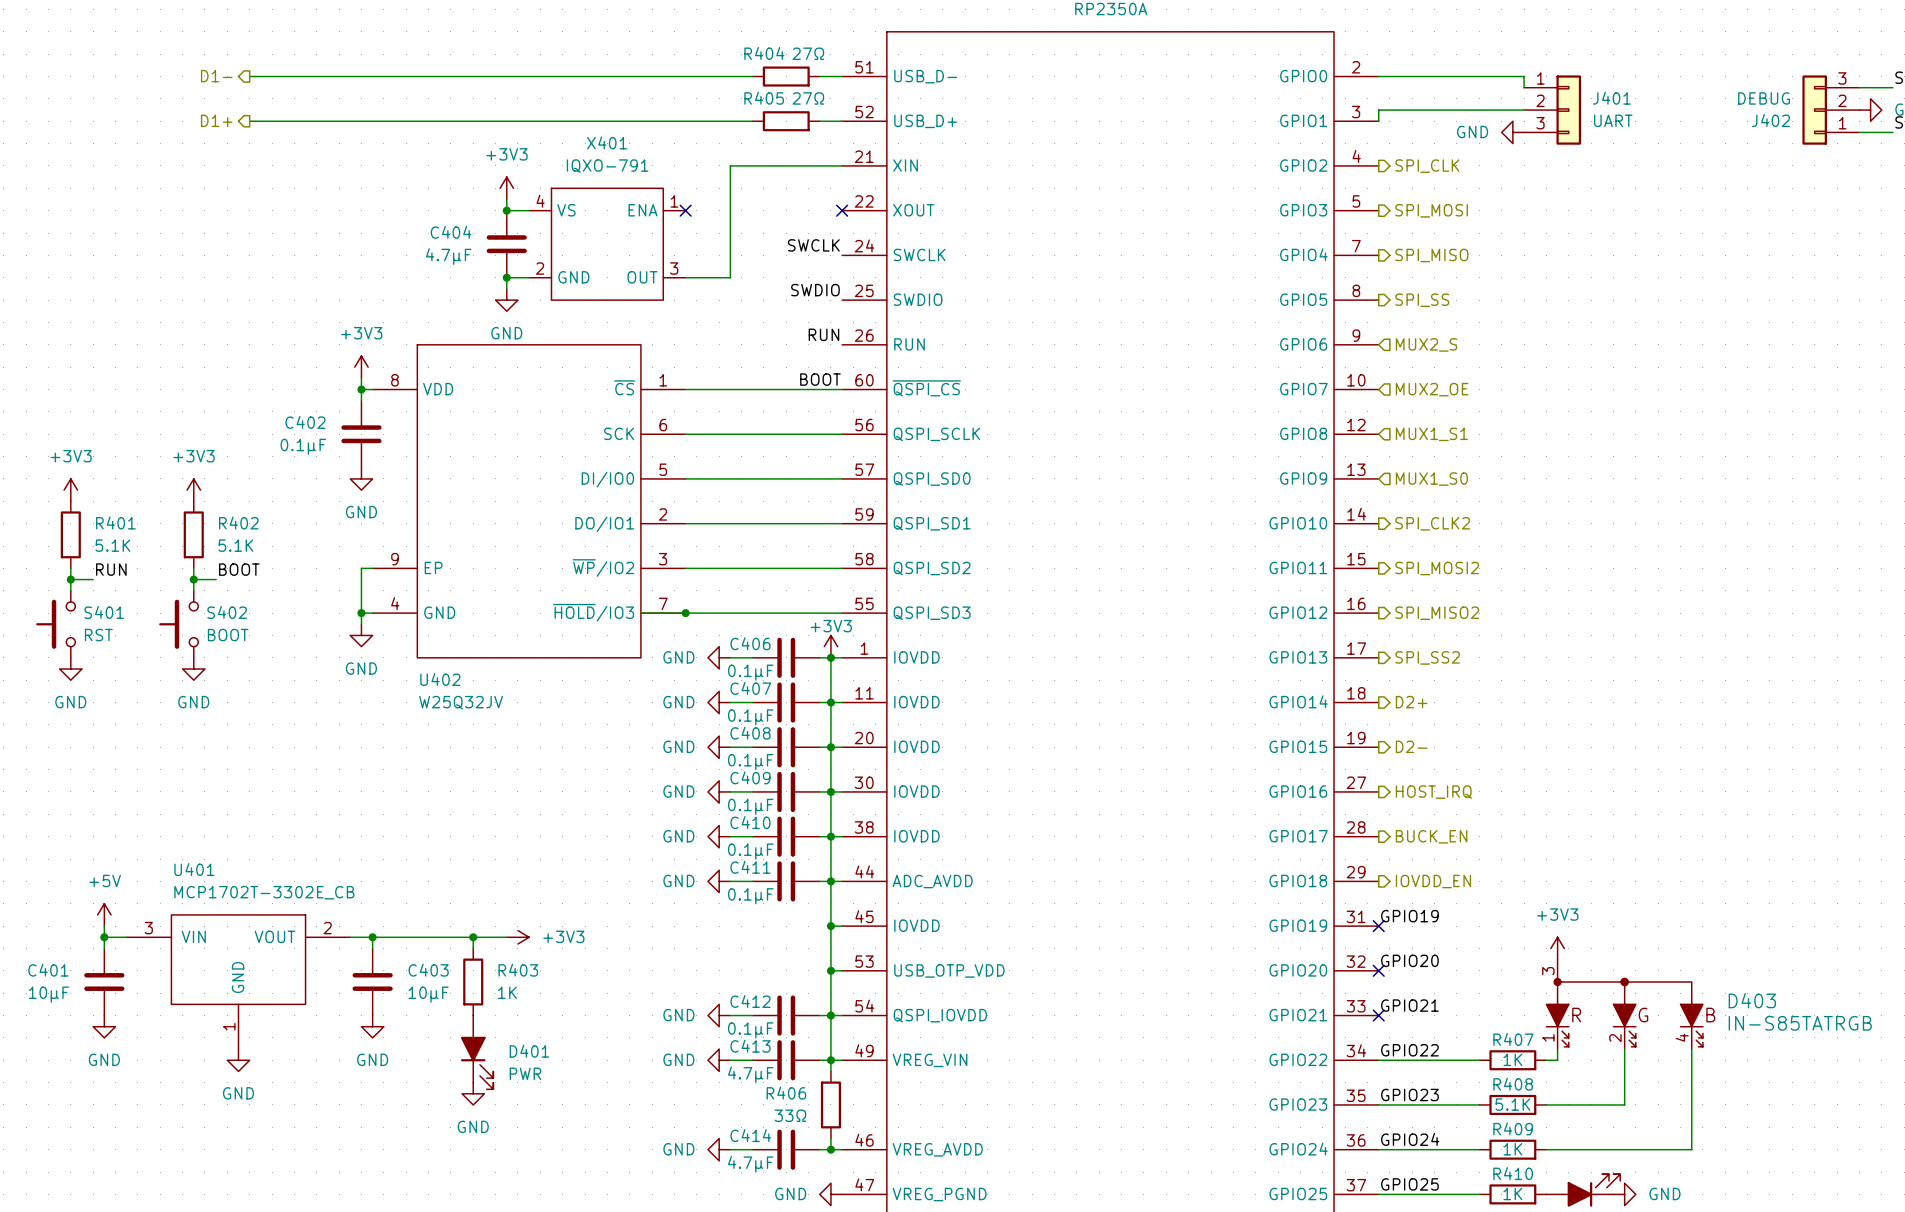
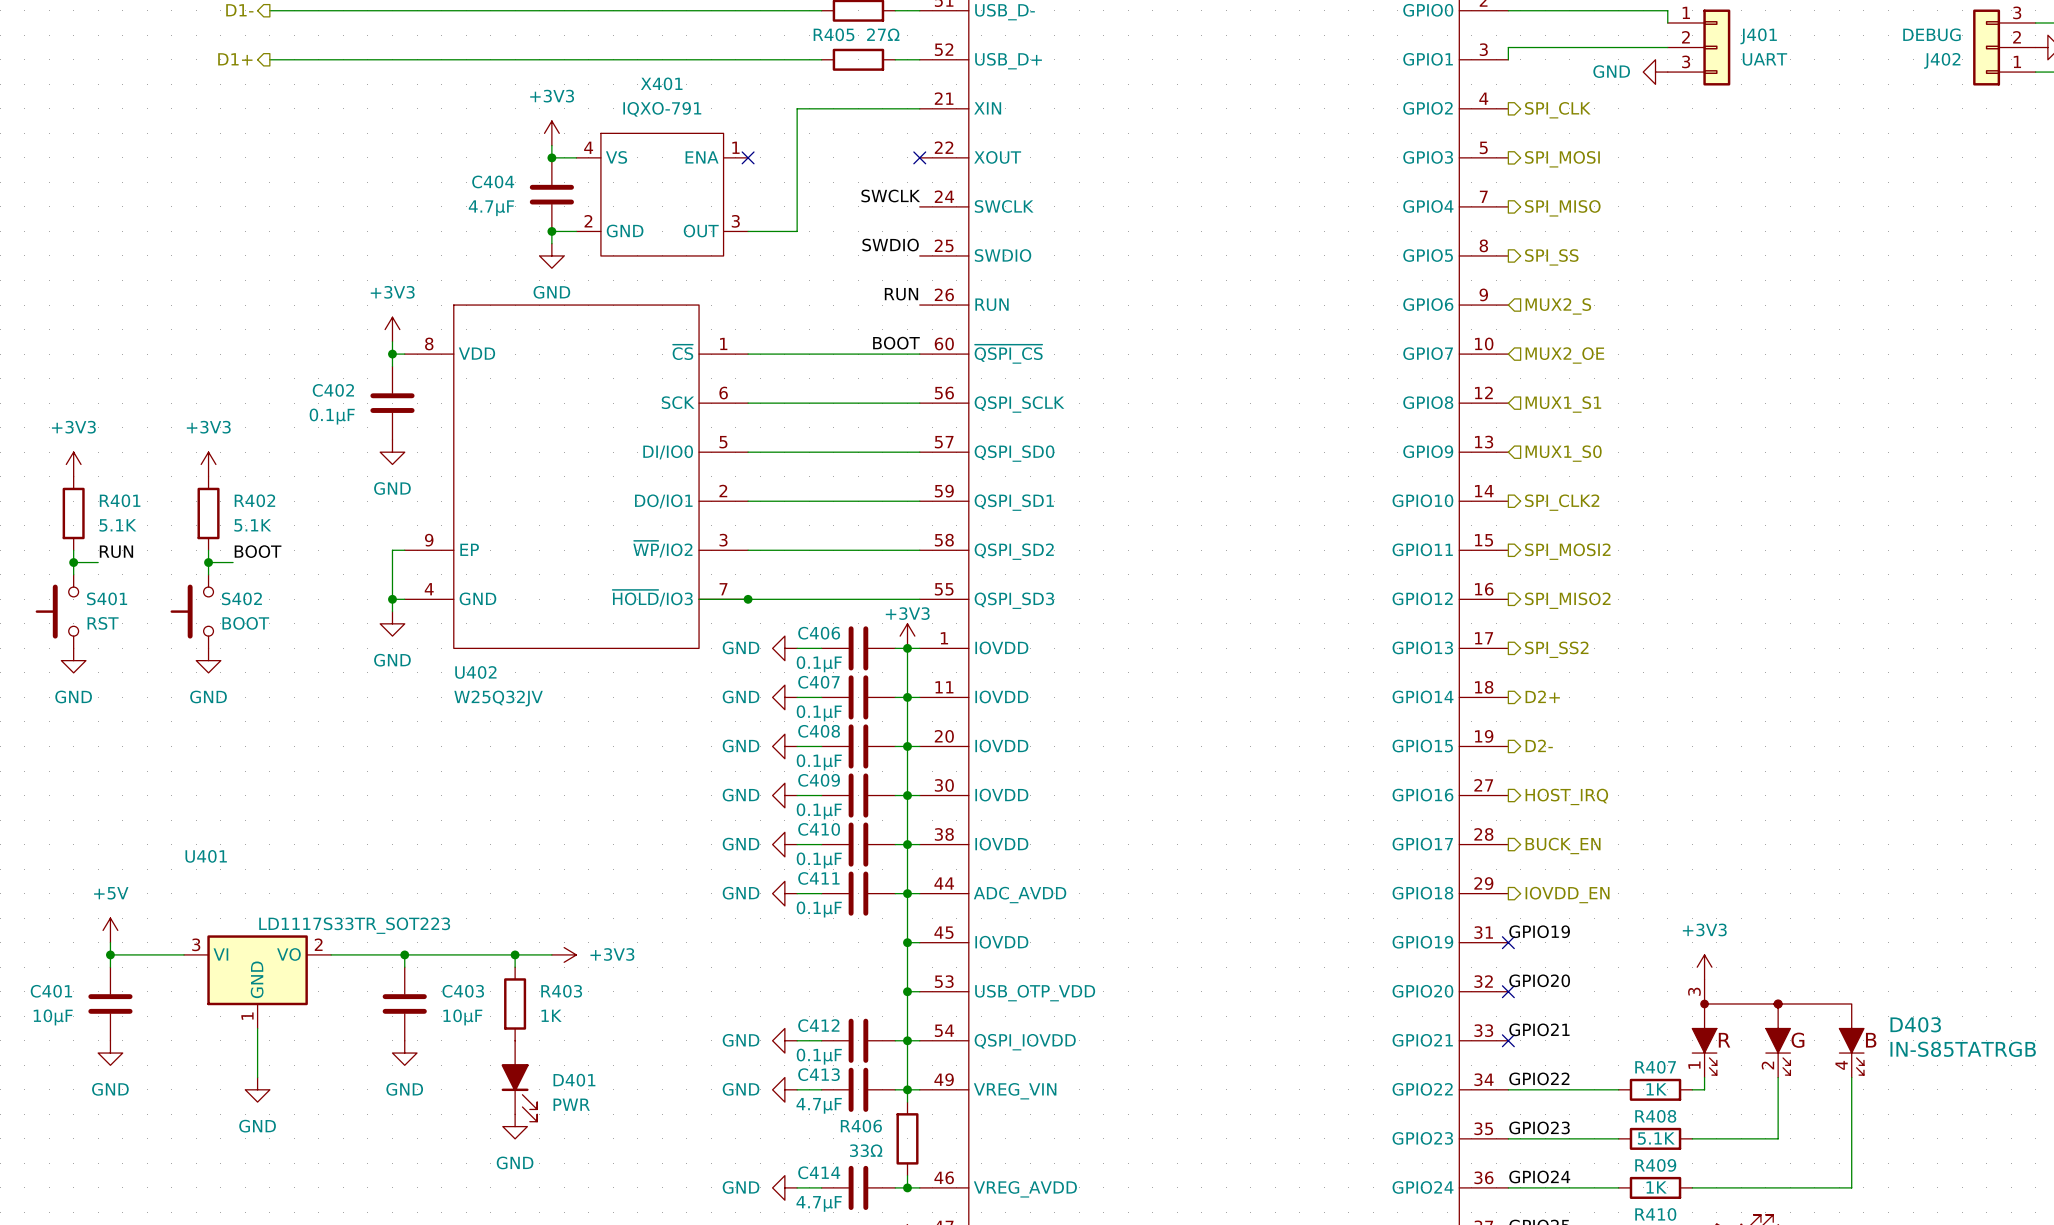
U401 value: MCP1702T-3302E_CB (264, 892) -> LD1117S33TR_SOT223 (354, 925)
U401 symbol: [126, 914, 351, 1050] -> [184, 935, 332, 1029]

